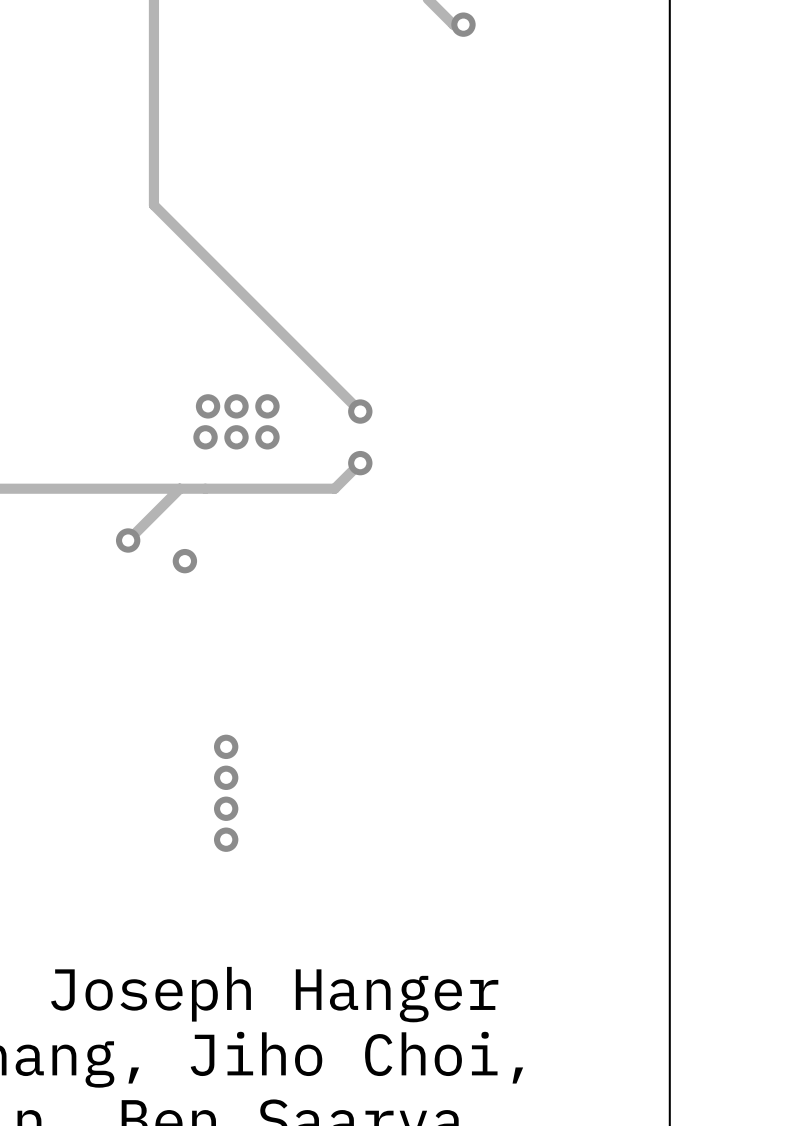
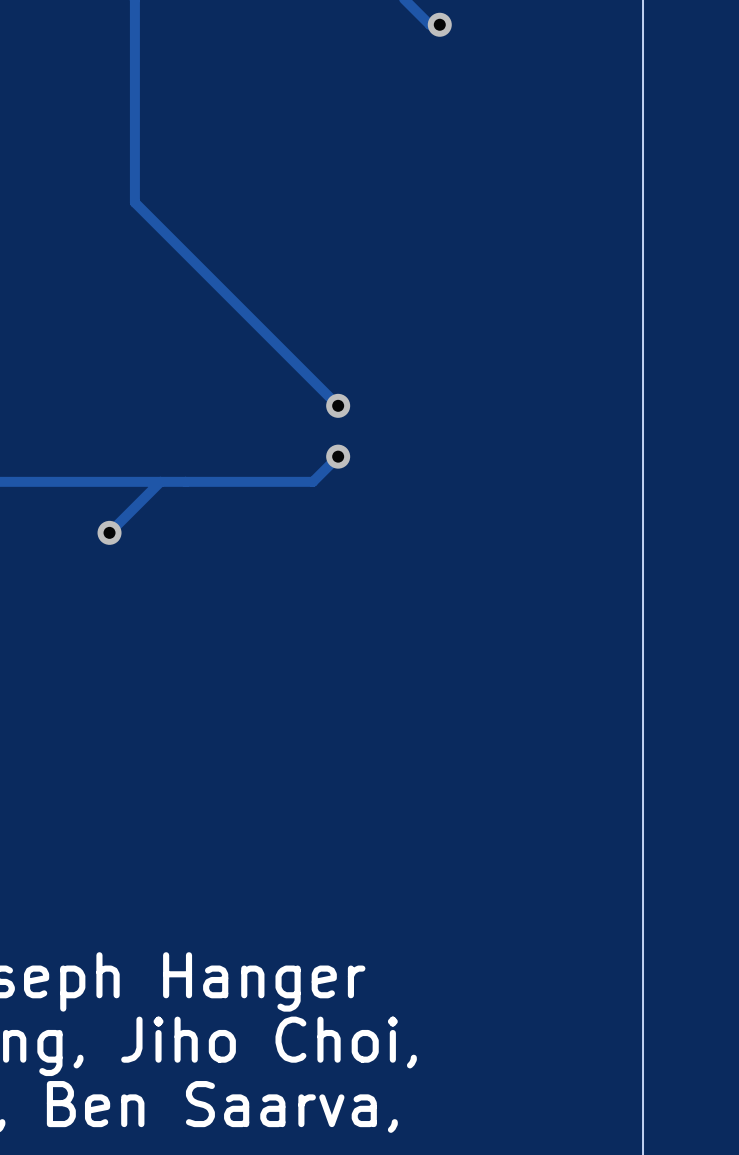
via: (208, 406) -> none
via: (236, 406) -> none
via: (267, 406) -> none
via: (205, 437) -> none
via: (236, 437) -> none
via: (267, 437) -> none
via: (184, 561) -> none
via: (226, 746) -> none
via: (226, 777) -> none
via: (226, 808) -> none
via: (226, 839) -> none

